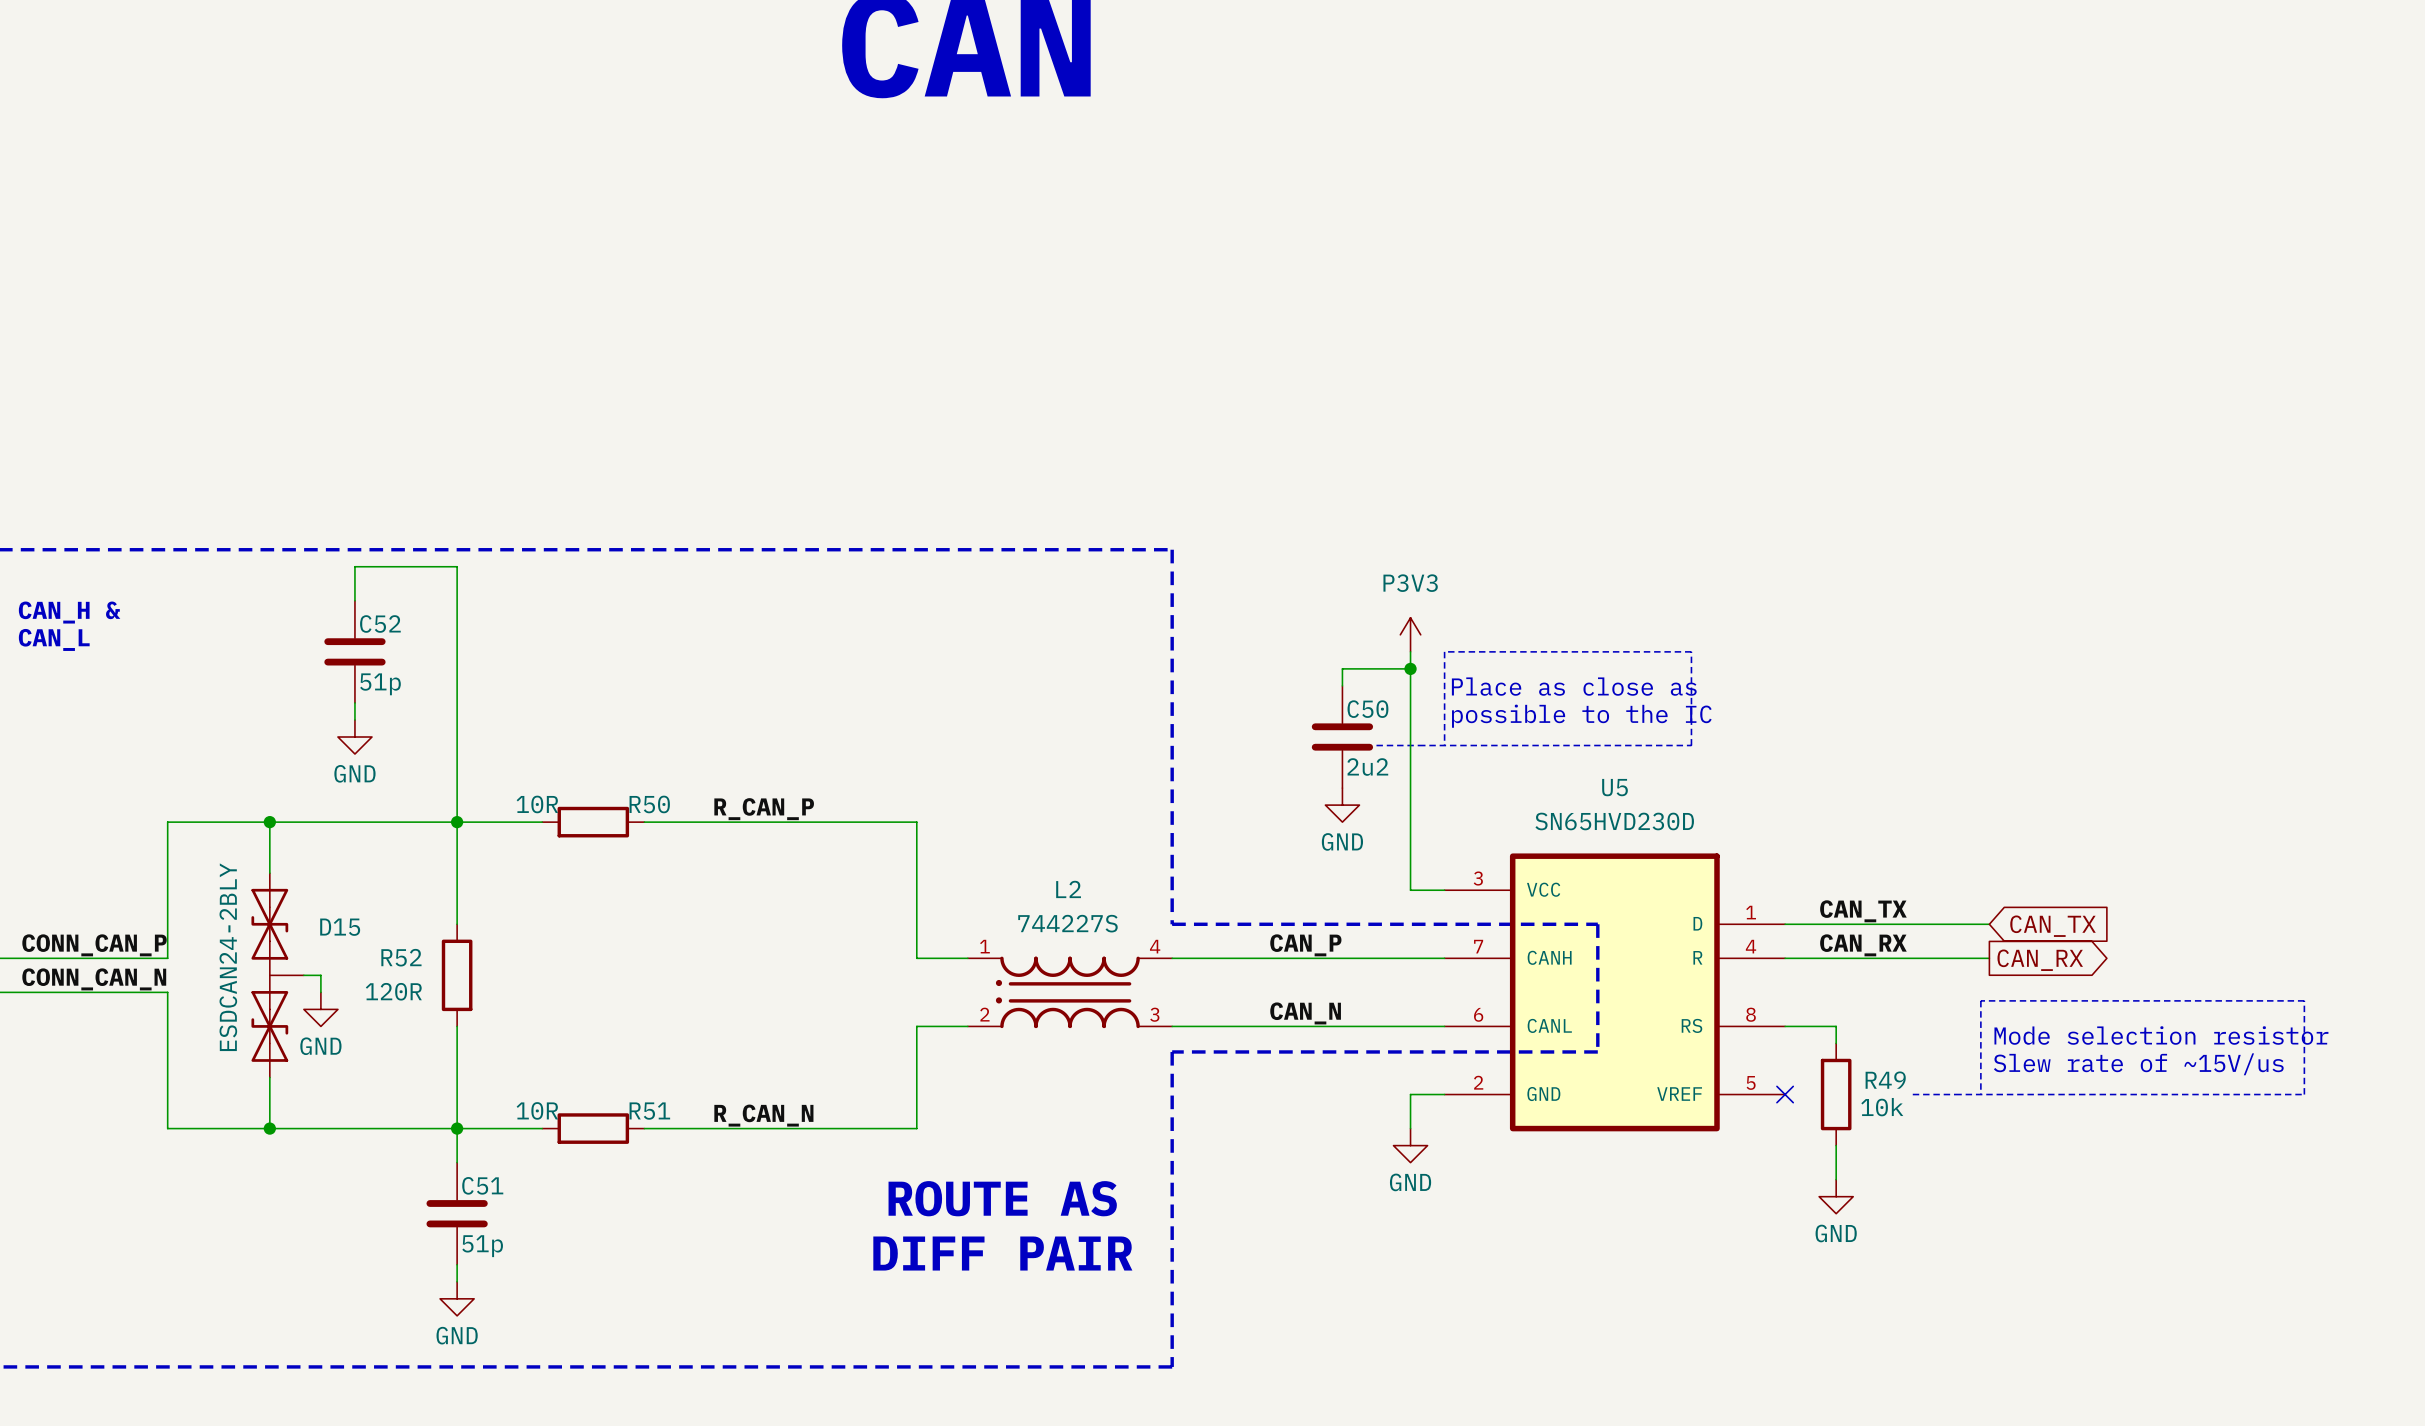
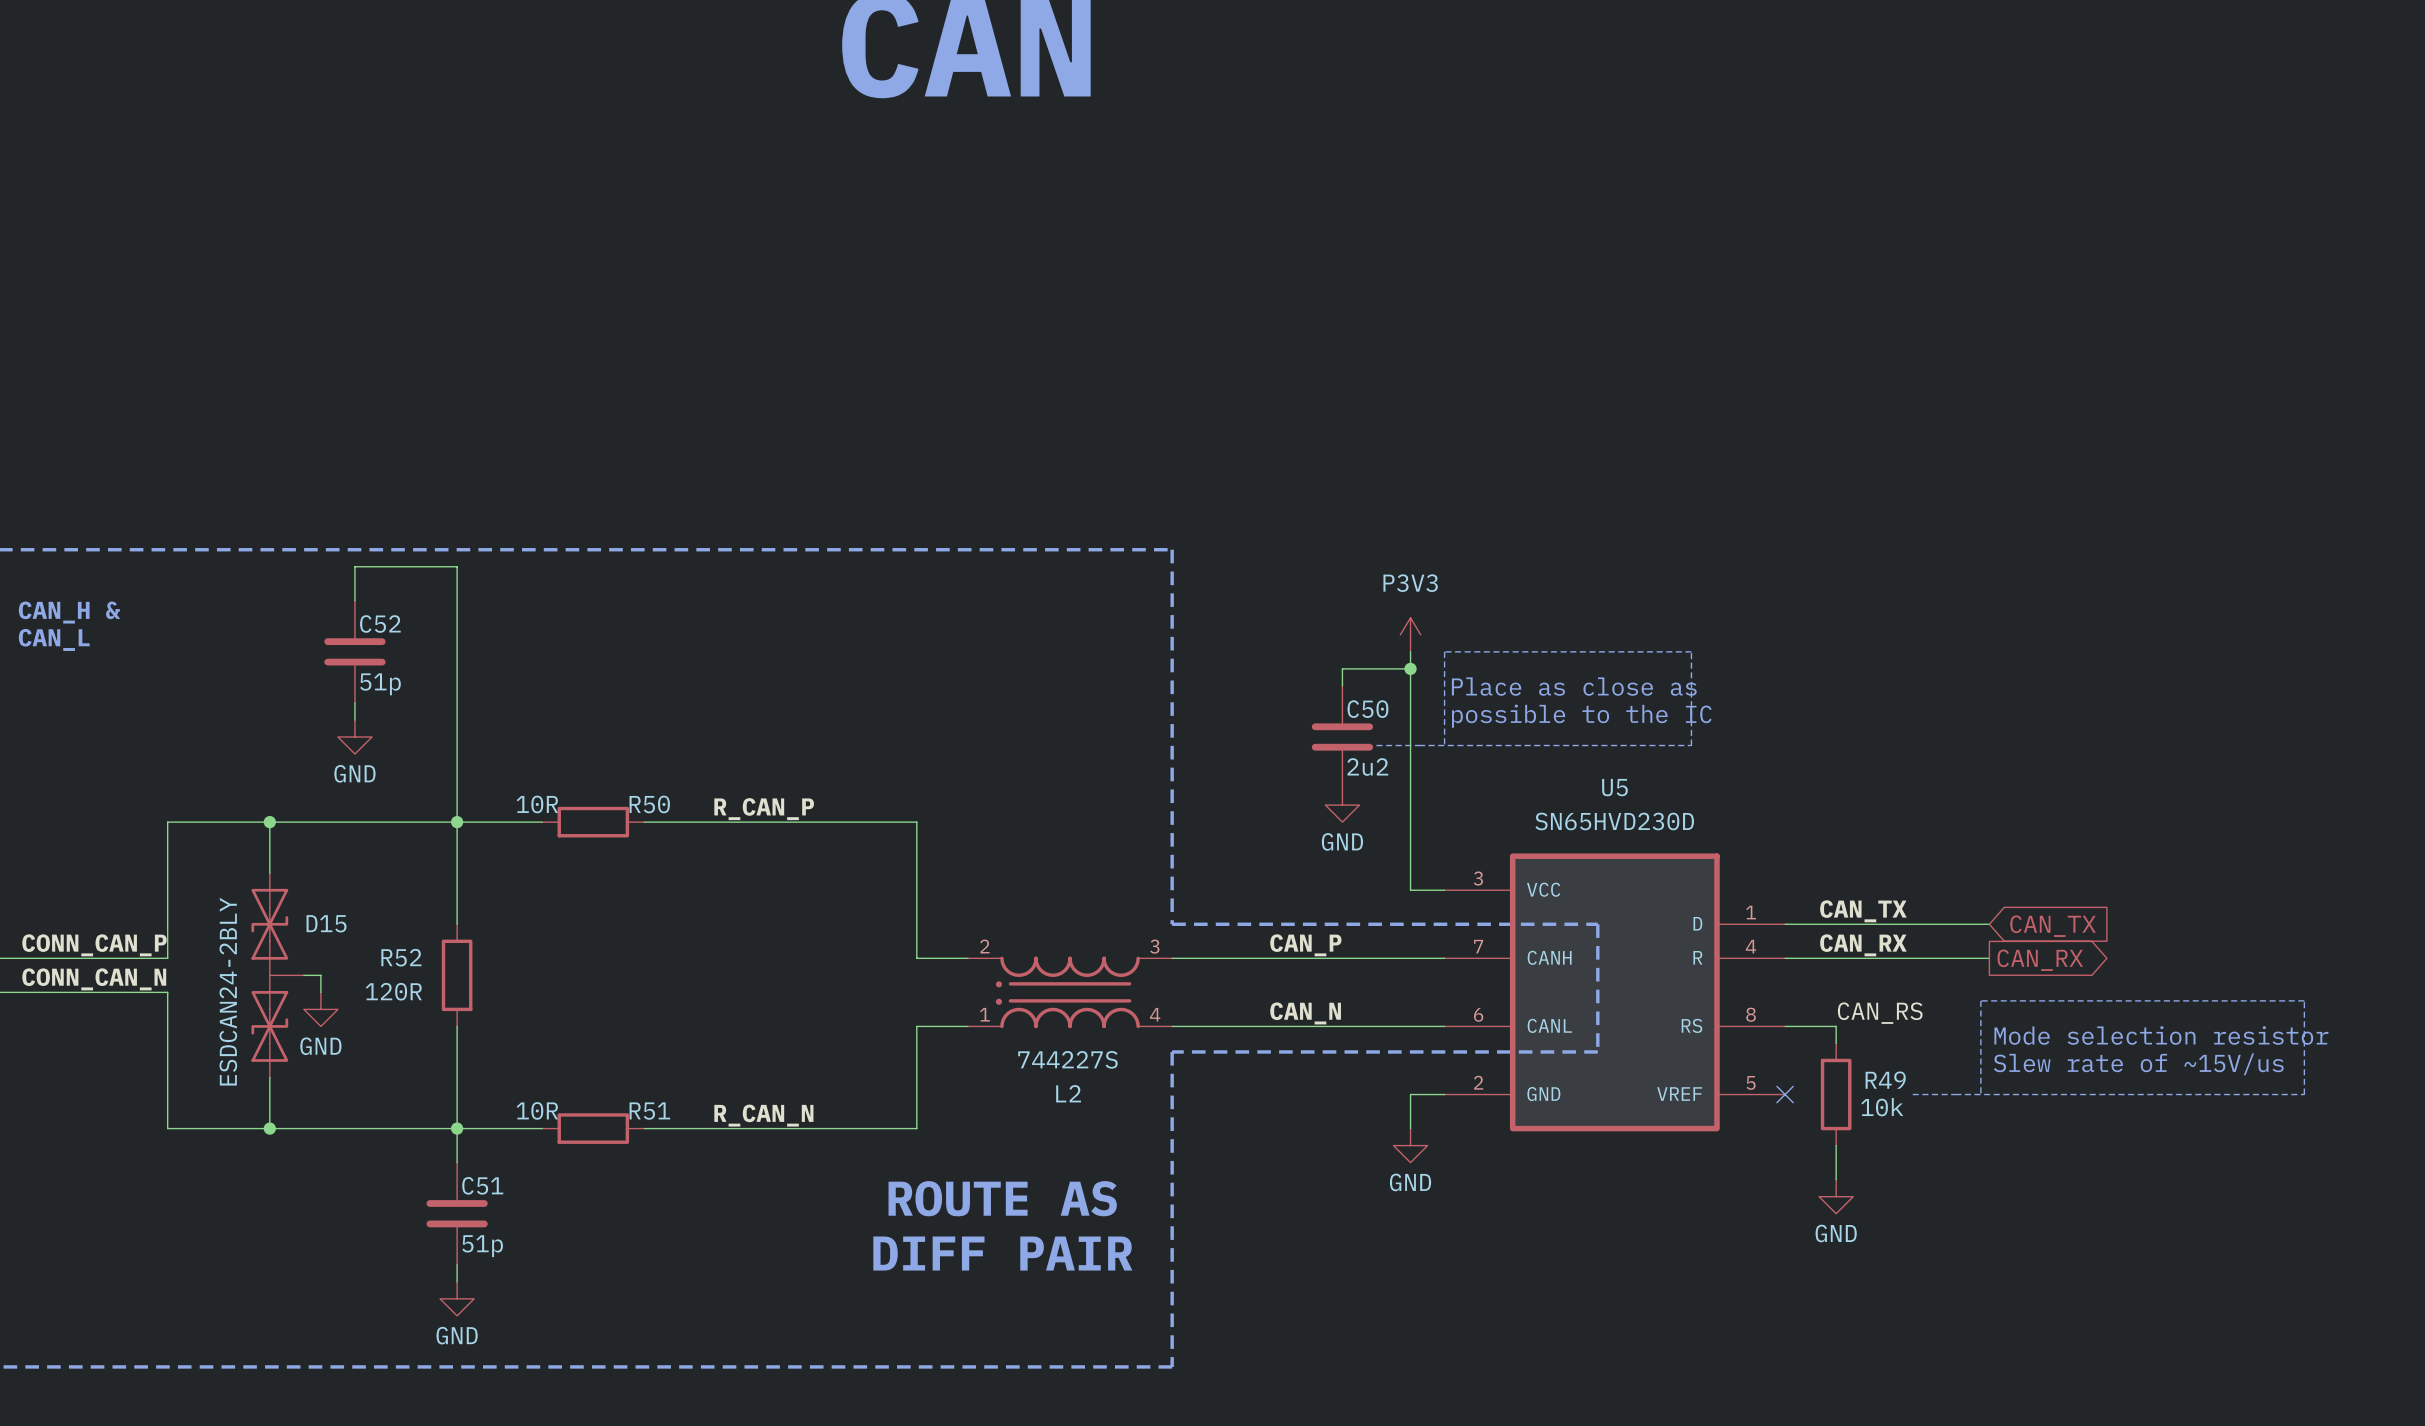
D15 flip: as is (269, 975) -> up-down (269, 975)
L2 flip: as is (1067, 992) -> up-down (1067, 992)
label: none -> CAN_RS (1880, 1013)

